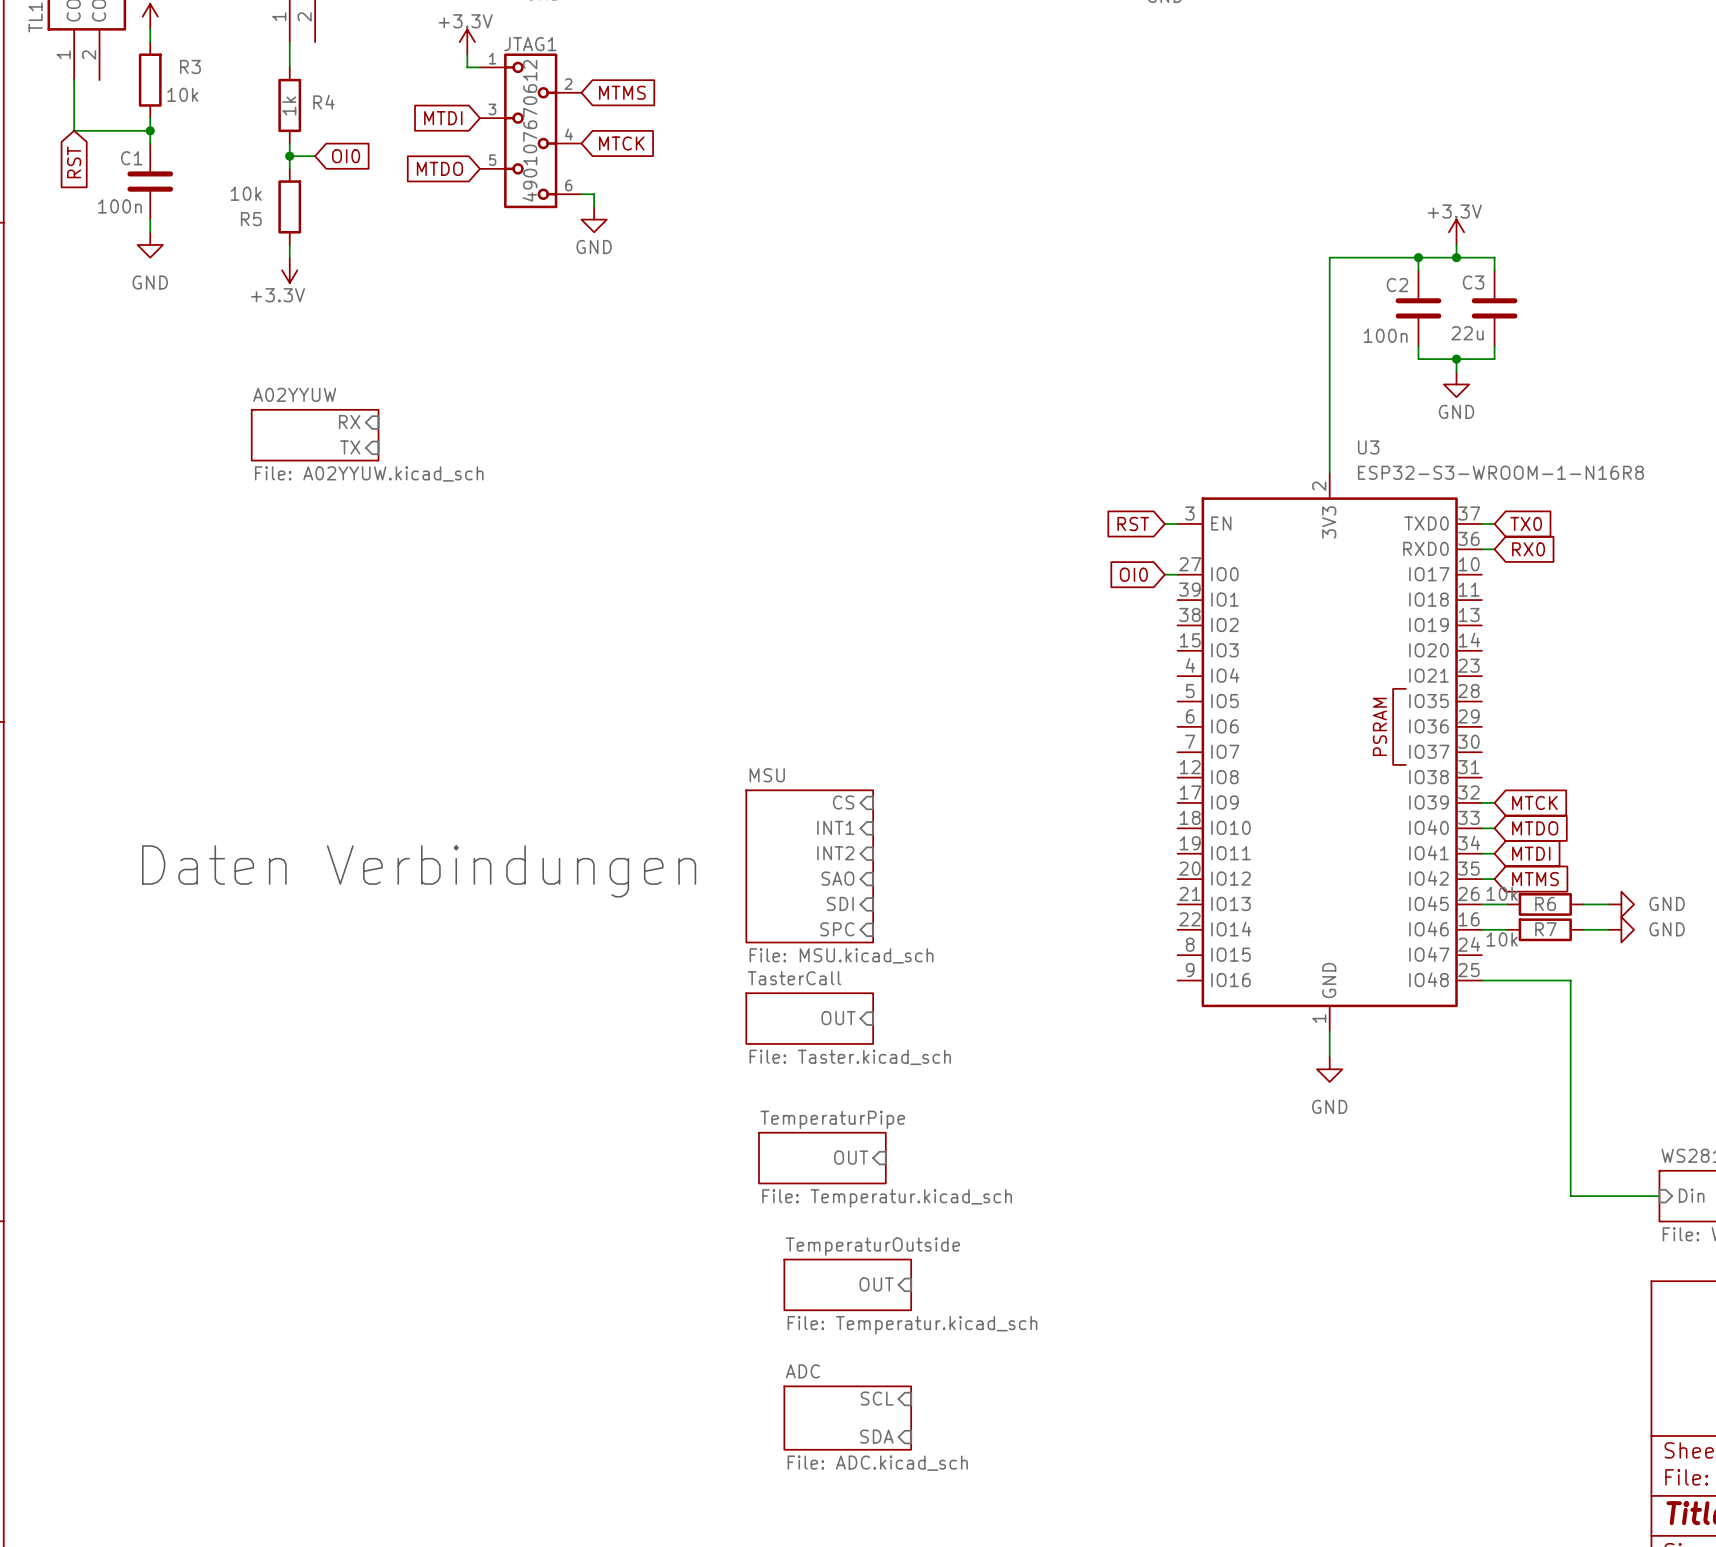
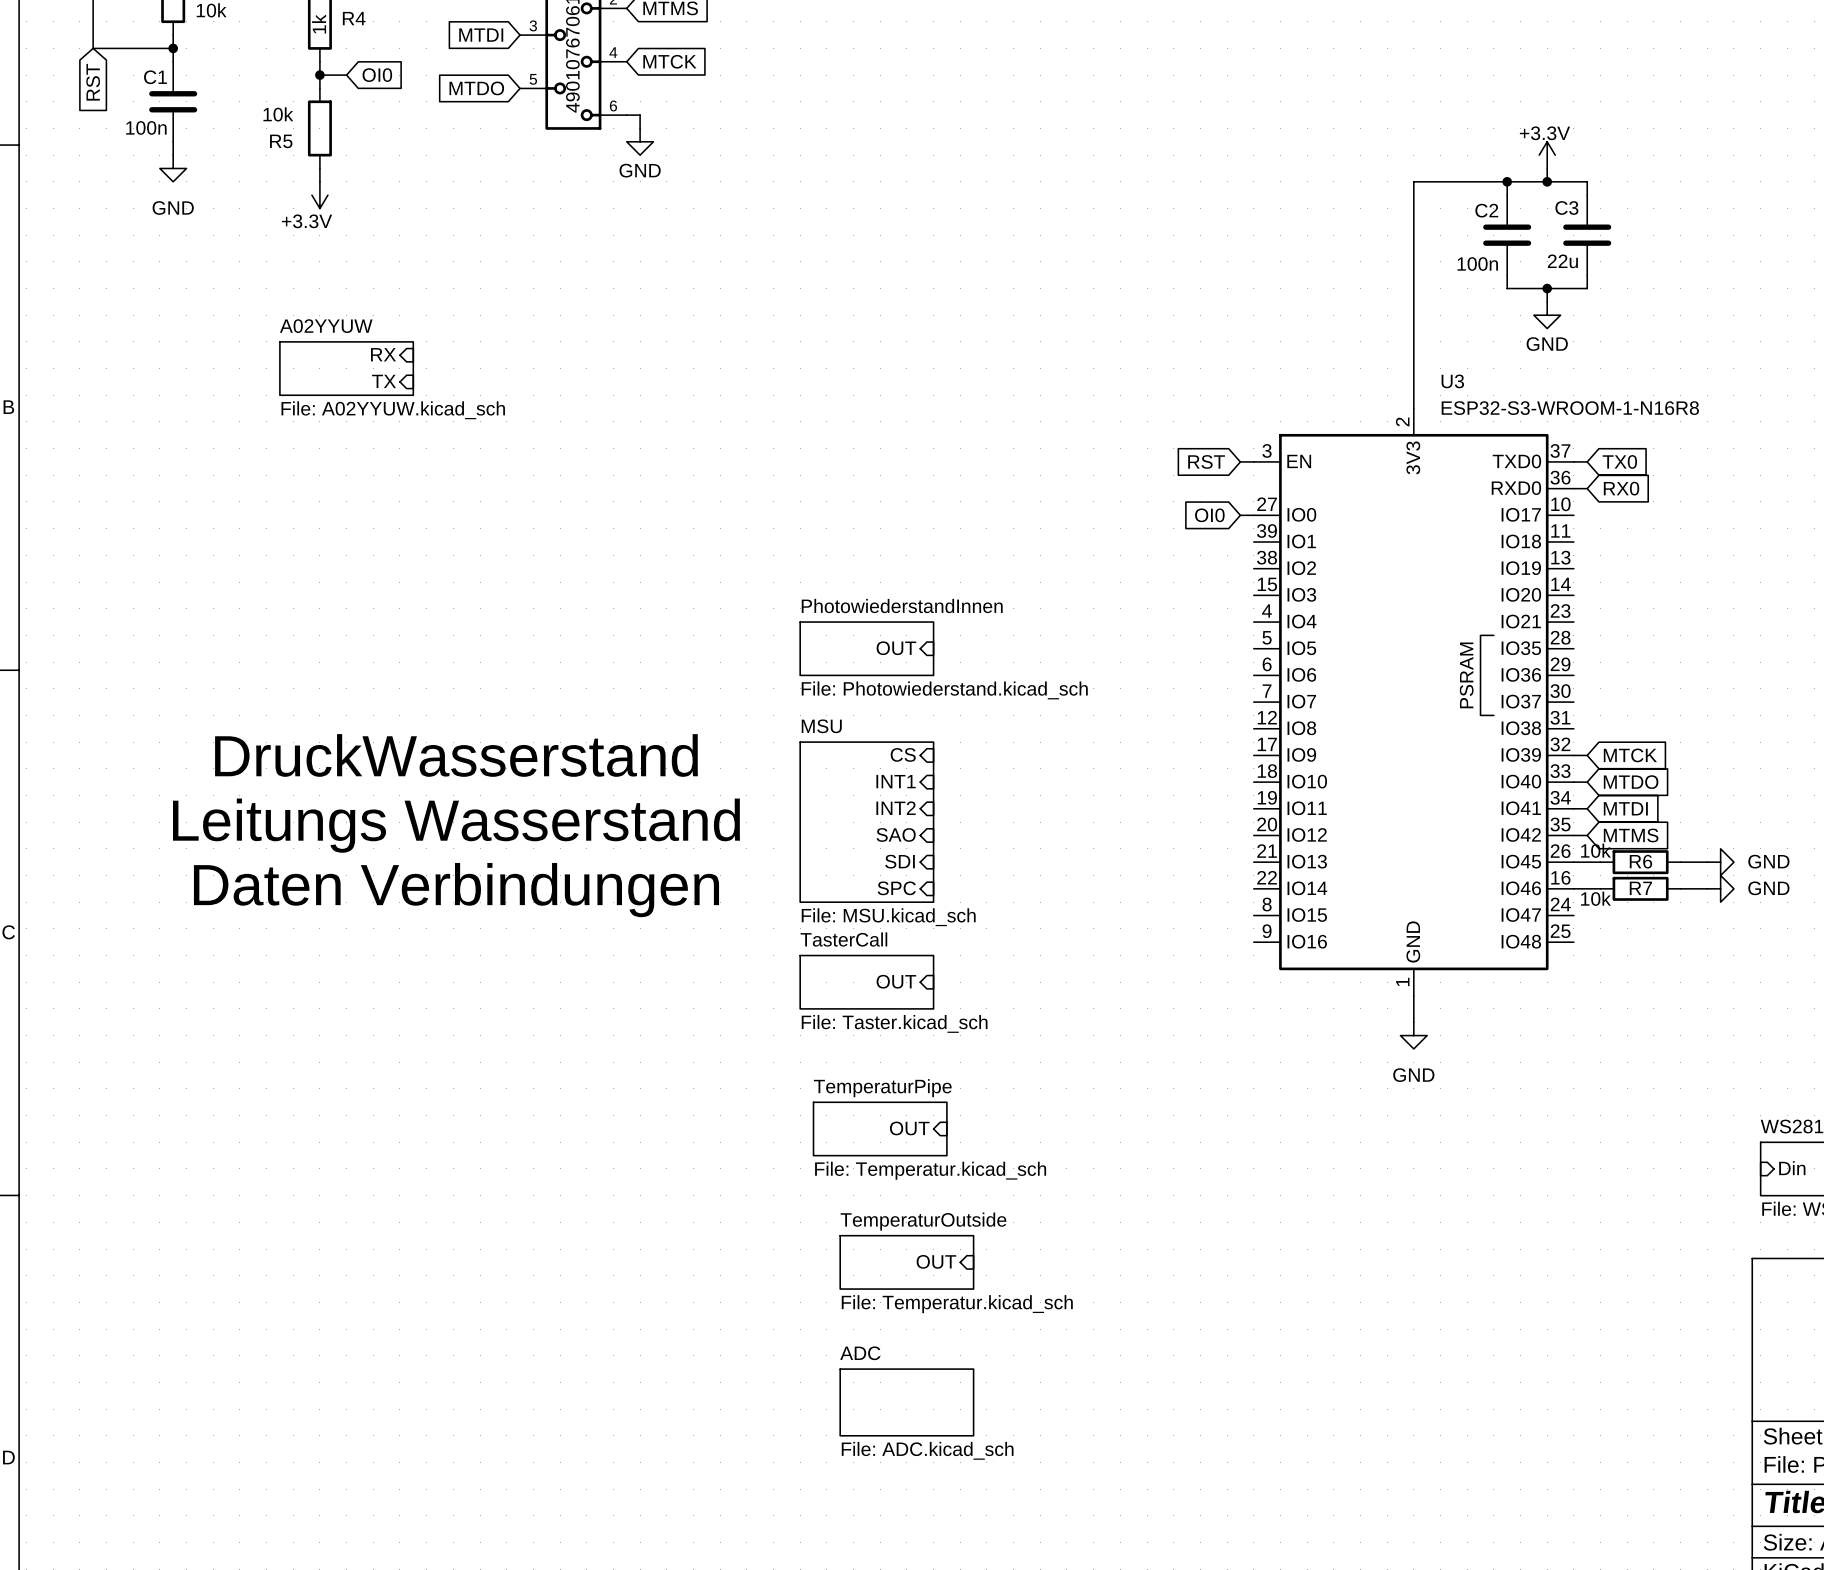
sheet PhotowiederstandInnen: none -> File: Photowiederstand.kicad_sch (866, 648)
sheet pin: none -> OUT (896, 648)
text: none -> DruckWasserstand (456, 755)
text: Daten Verbindungen (419, 871) -> Leitungs Wasserstand (456, 825)
text: none -> Daten Verbindungen (456, 890)
wire: (1481, 980) (1570, 980) (1570, 1196) (1659, 1196) -> none
sheet pin: SCL (877, 1398) -> none
sheet pin: SDA (876, 1436) -> none

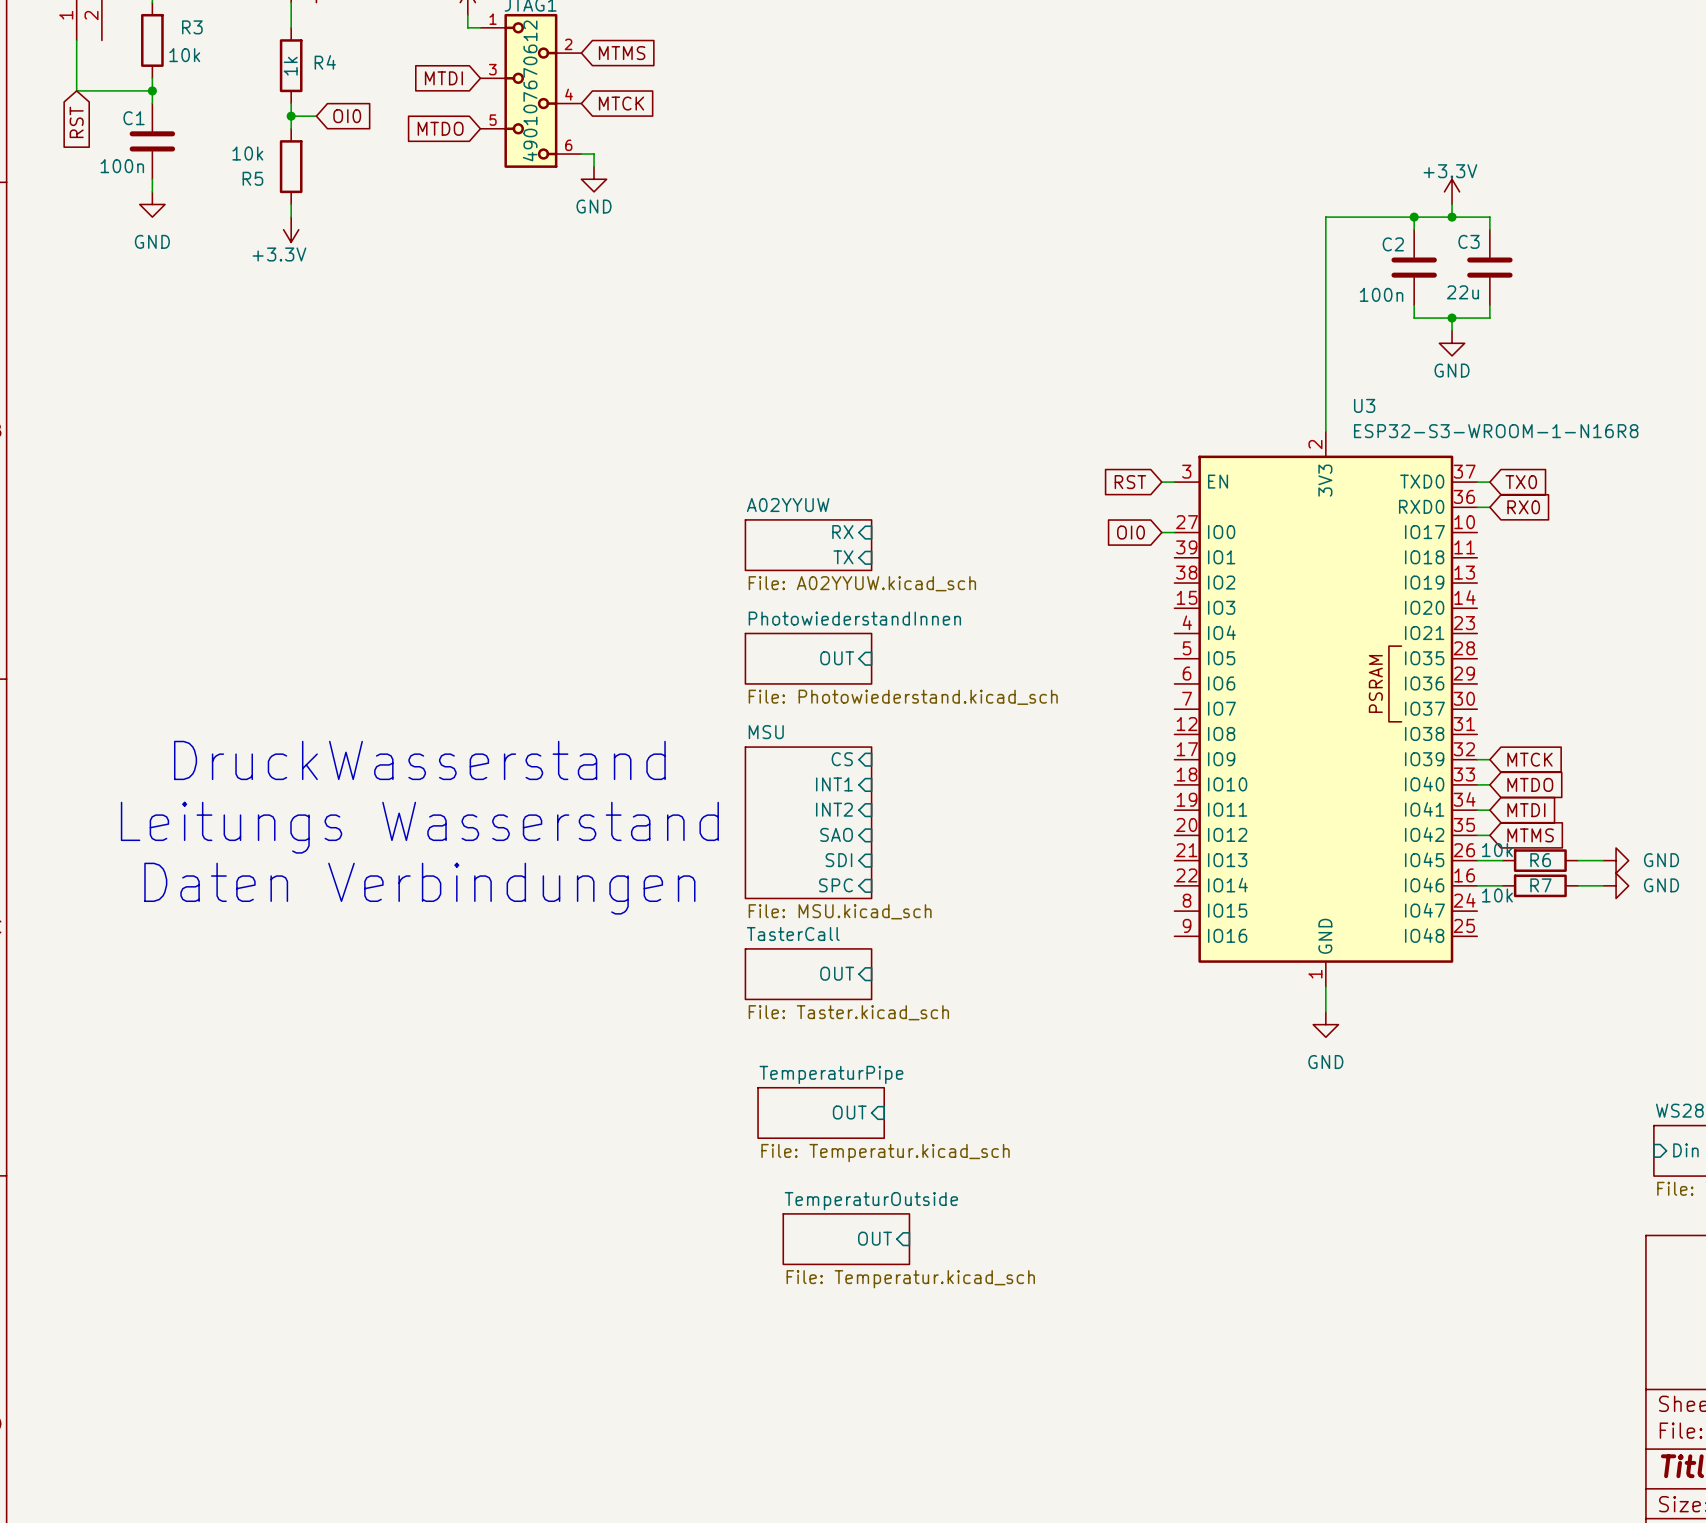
sheet pin: RX (383, 354) -> none
sheet A02YYUW position: (346, 368) -> (808, 545)
sheet pin: TX (383, 381) -> none
sheet pin: none -> RX (842, 532)
sheet pin: none -> TX (843, 557)
sheet ADC: File: ADC.kicad_sch (906, 1402) -> none

